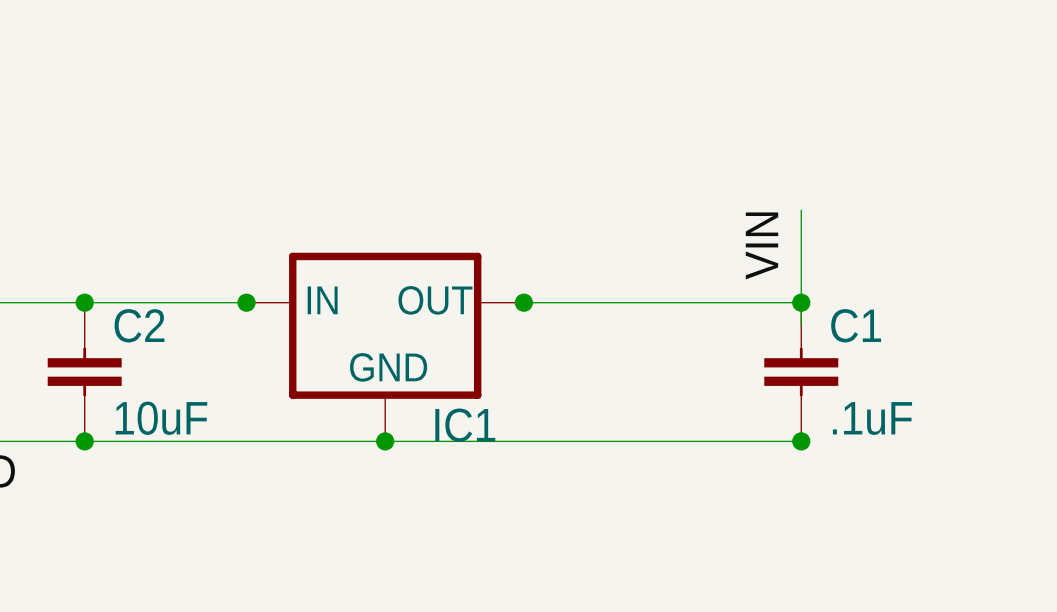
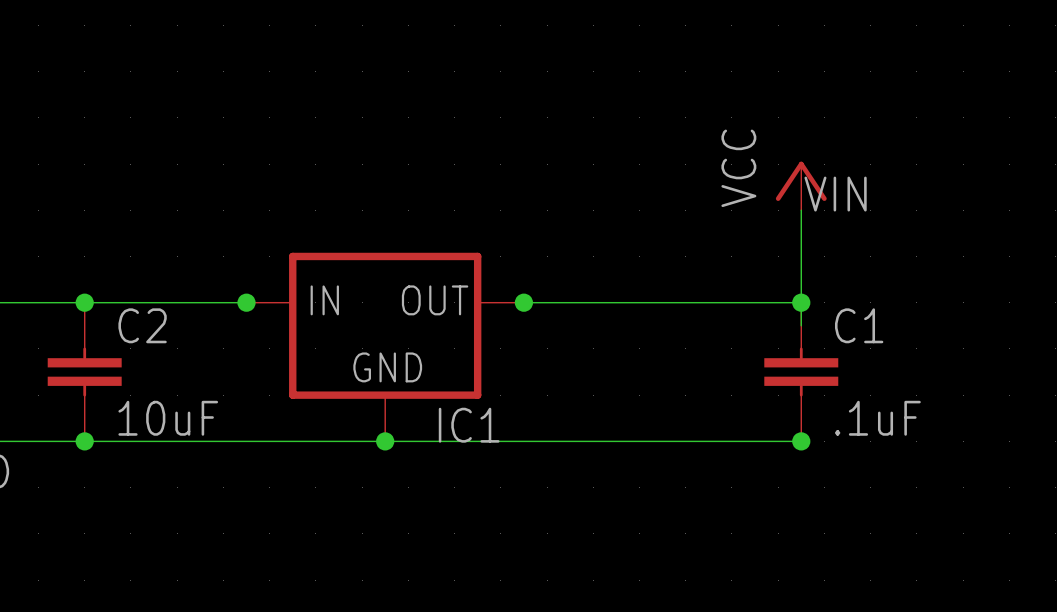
power symbol: none -> VCC (801, 185)
label rotation: 0° (761, 245) -> 90° clockwise (835, 194)

